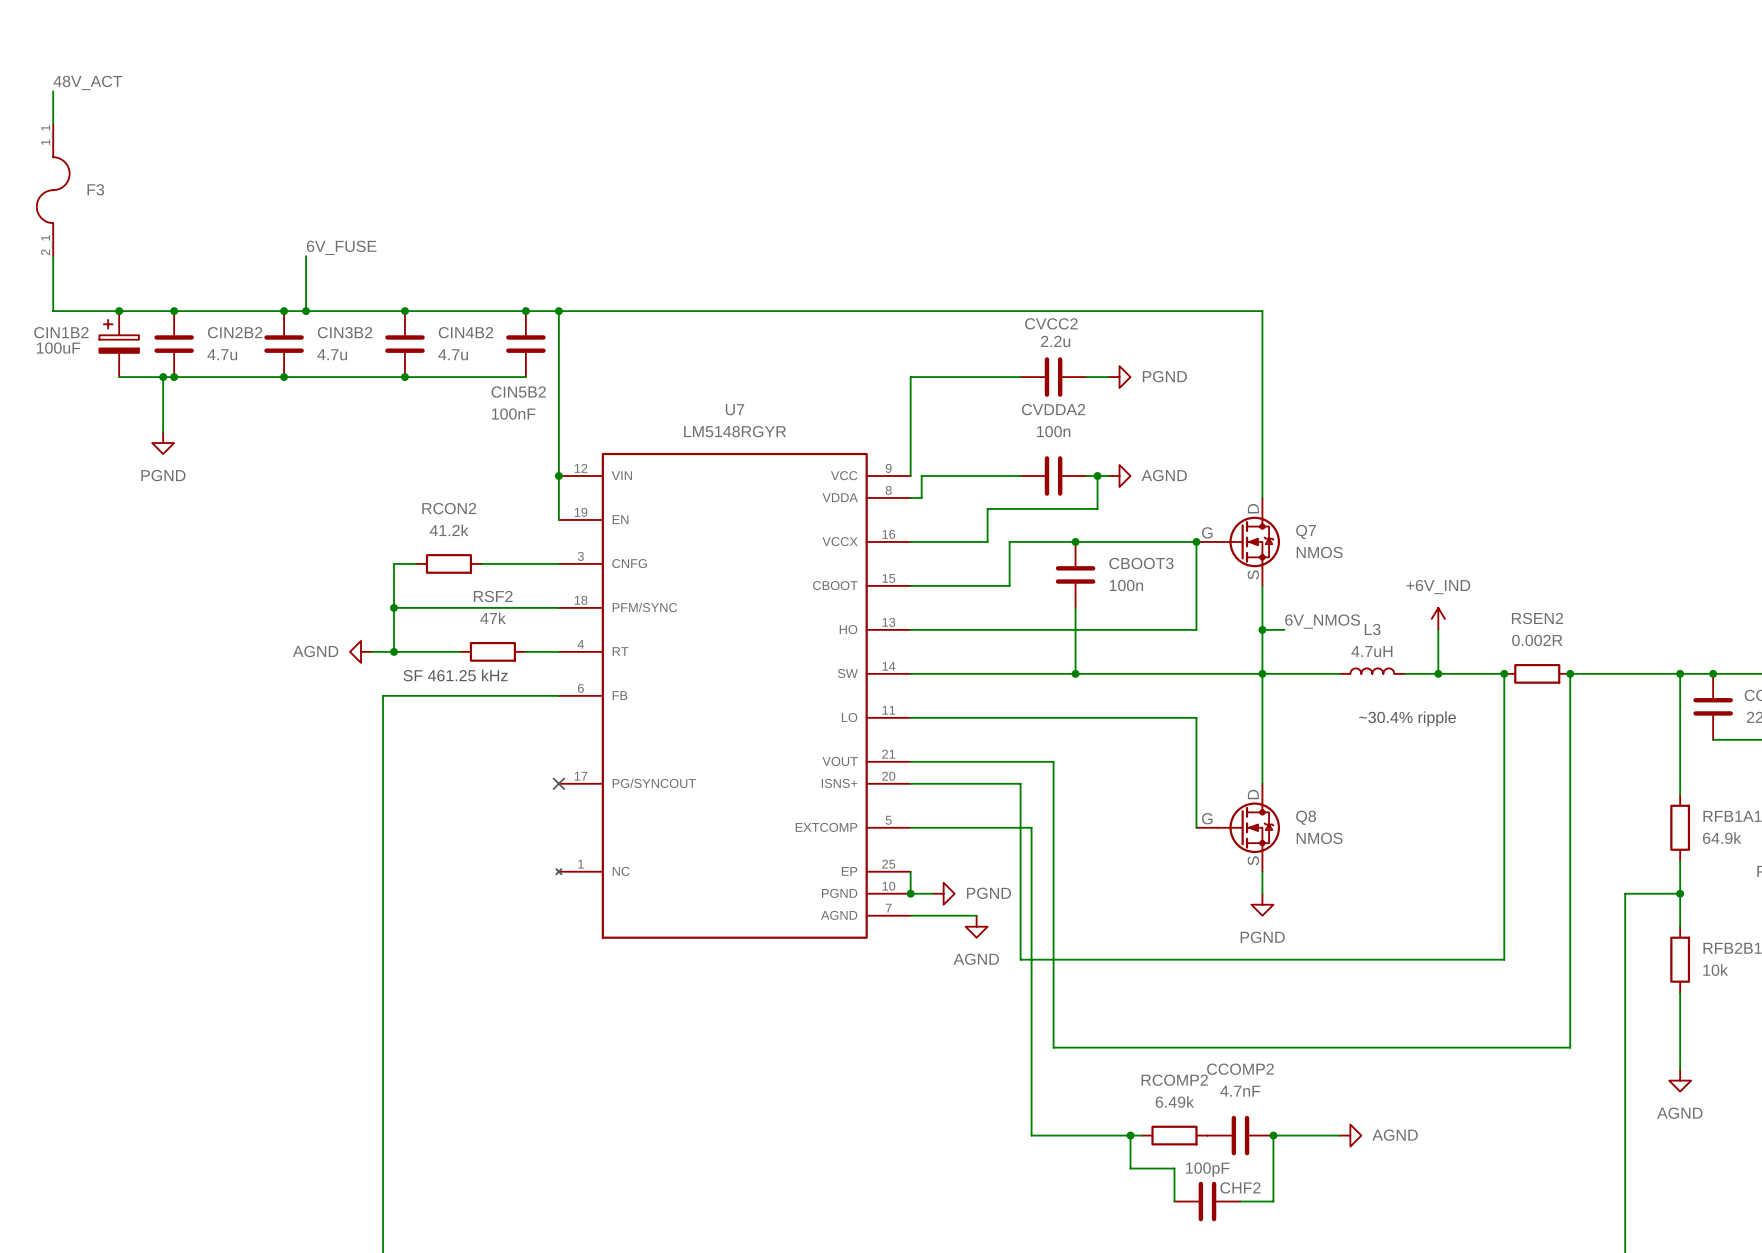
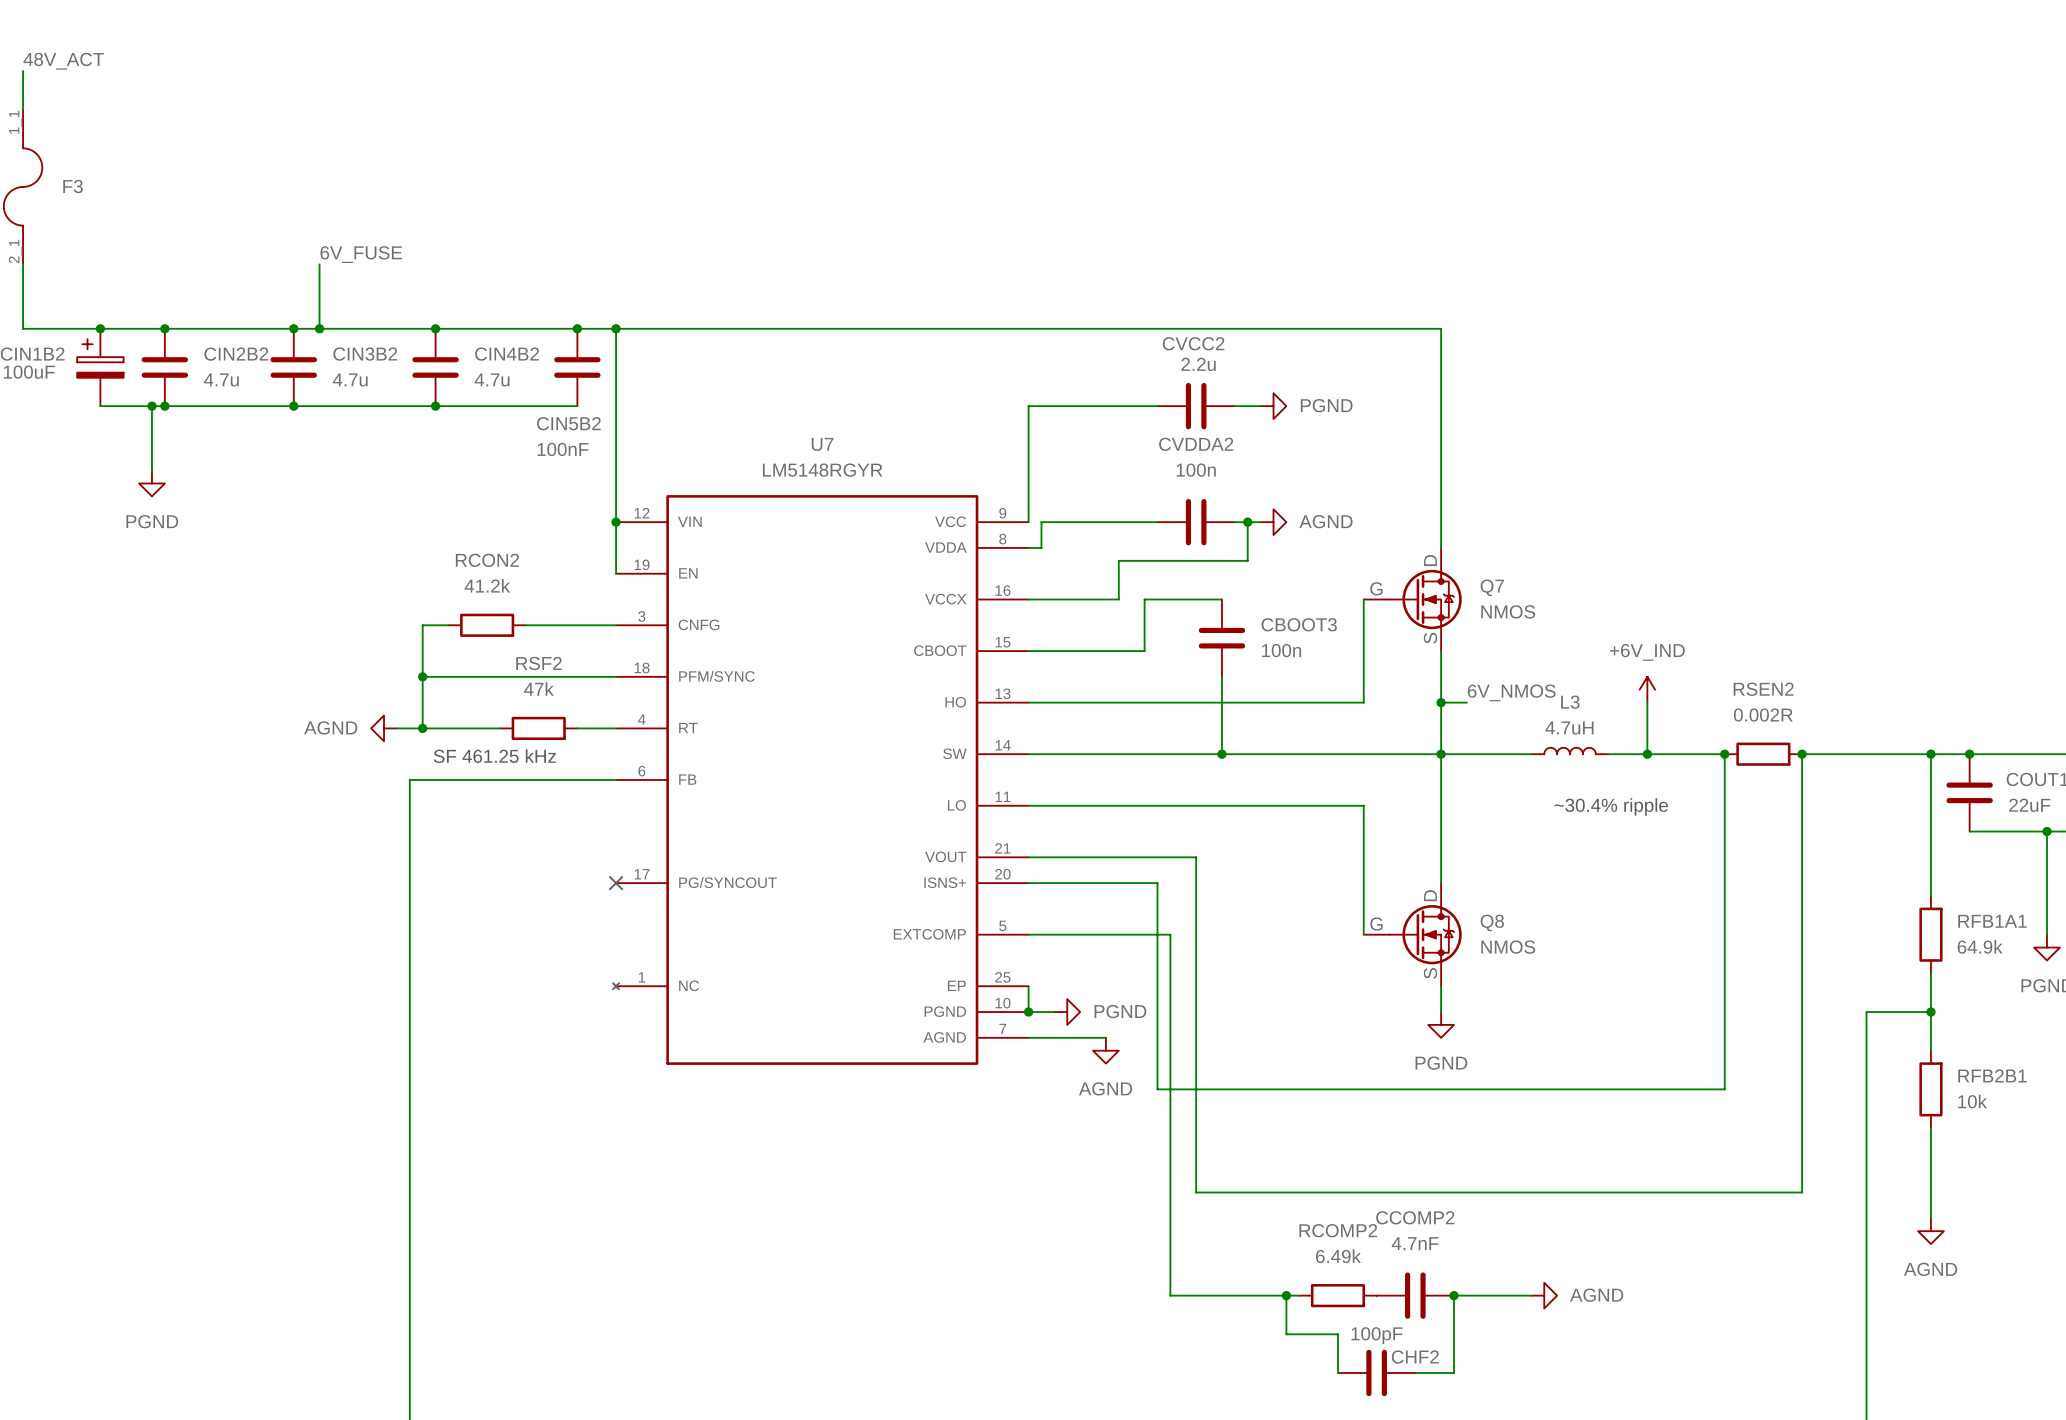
wire: (1075, 541) (1196, 541) -> none
junction: (1075, 541) -> none
junction: (1196, 541) -> none

